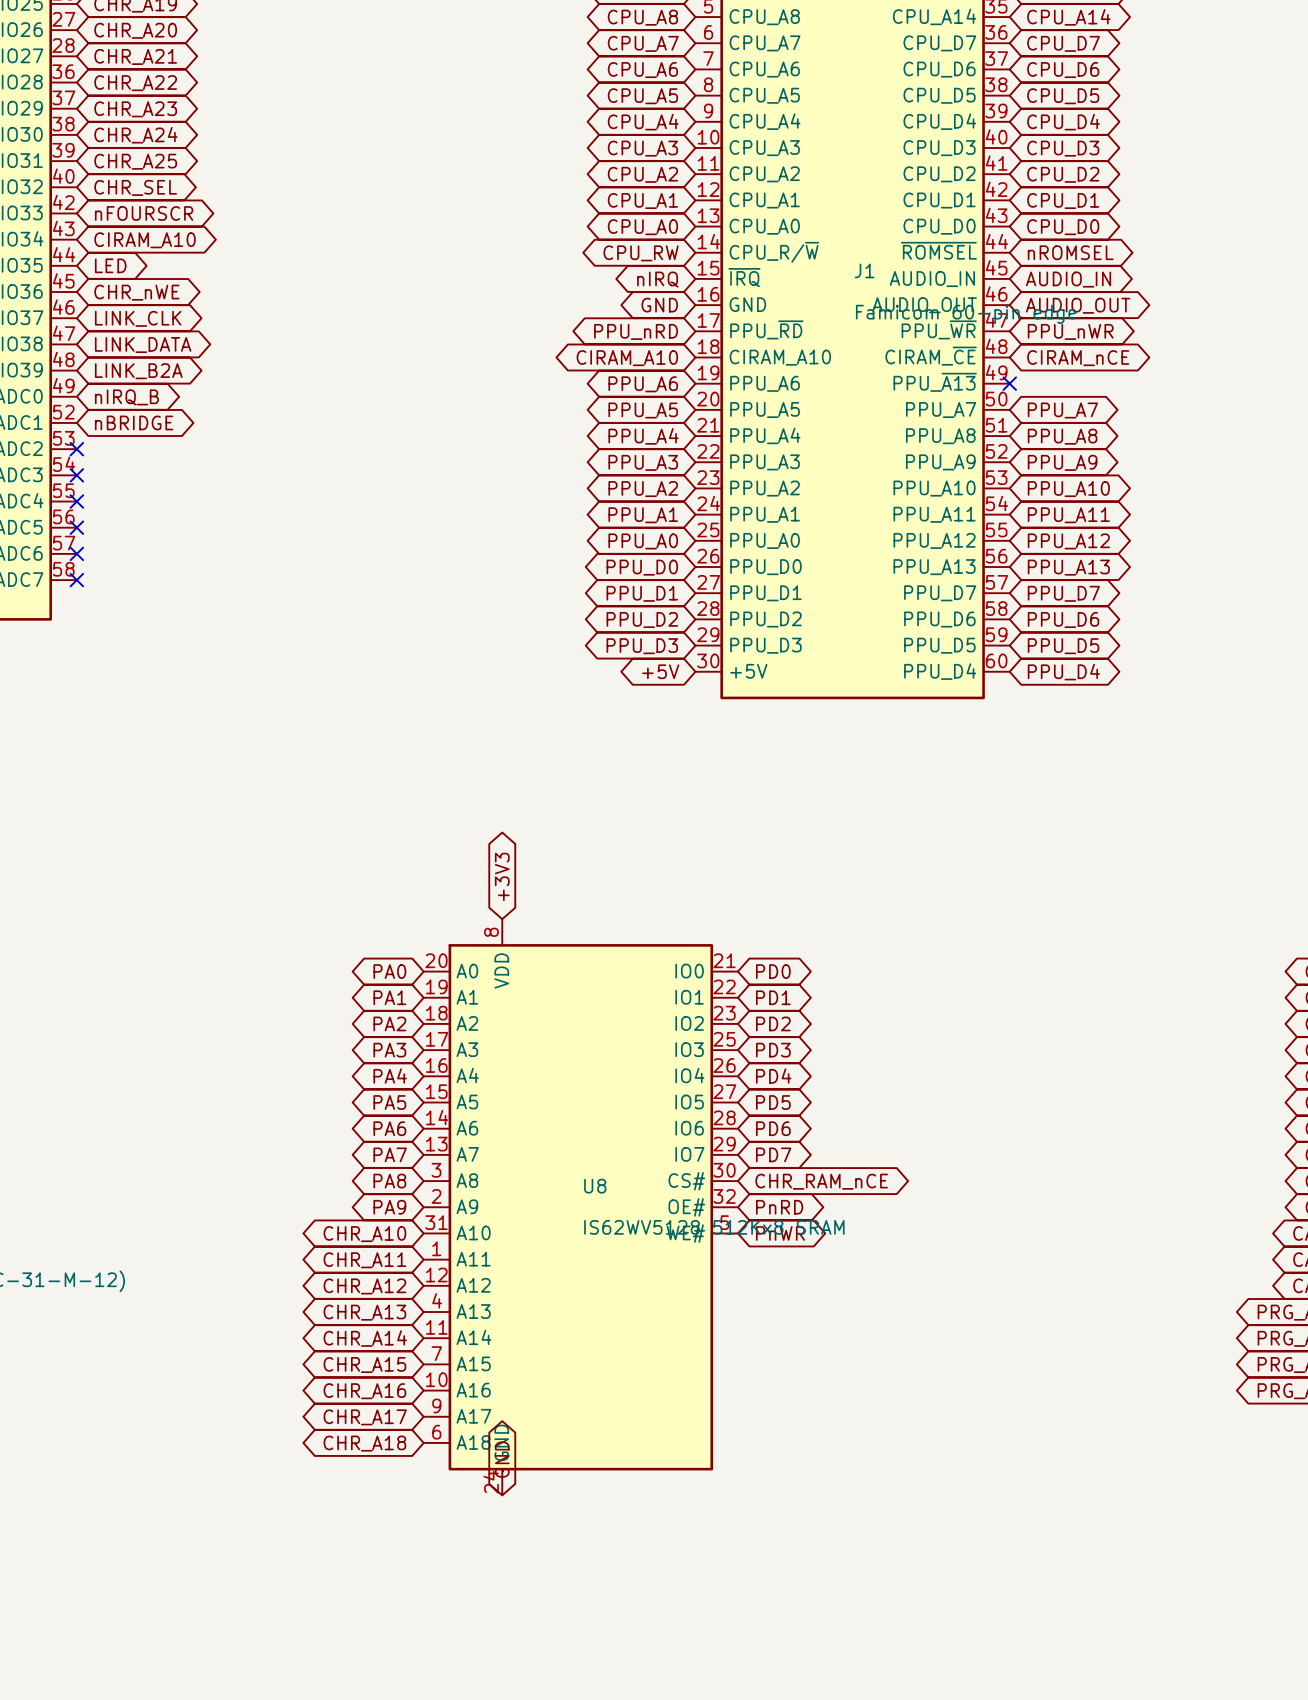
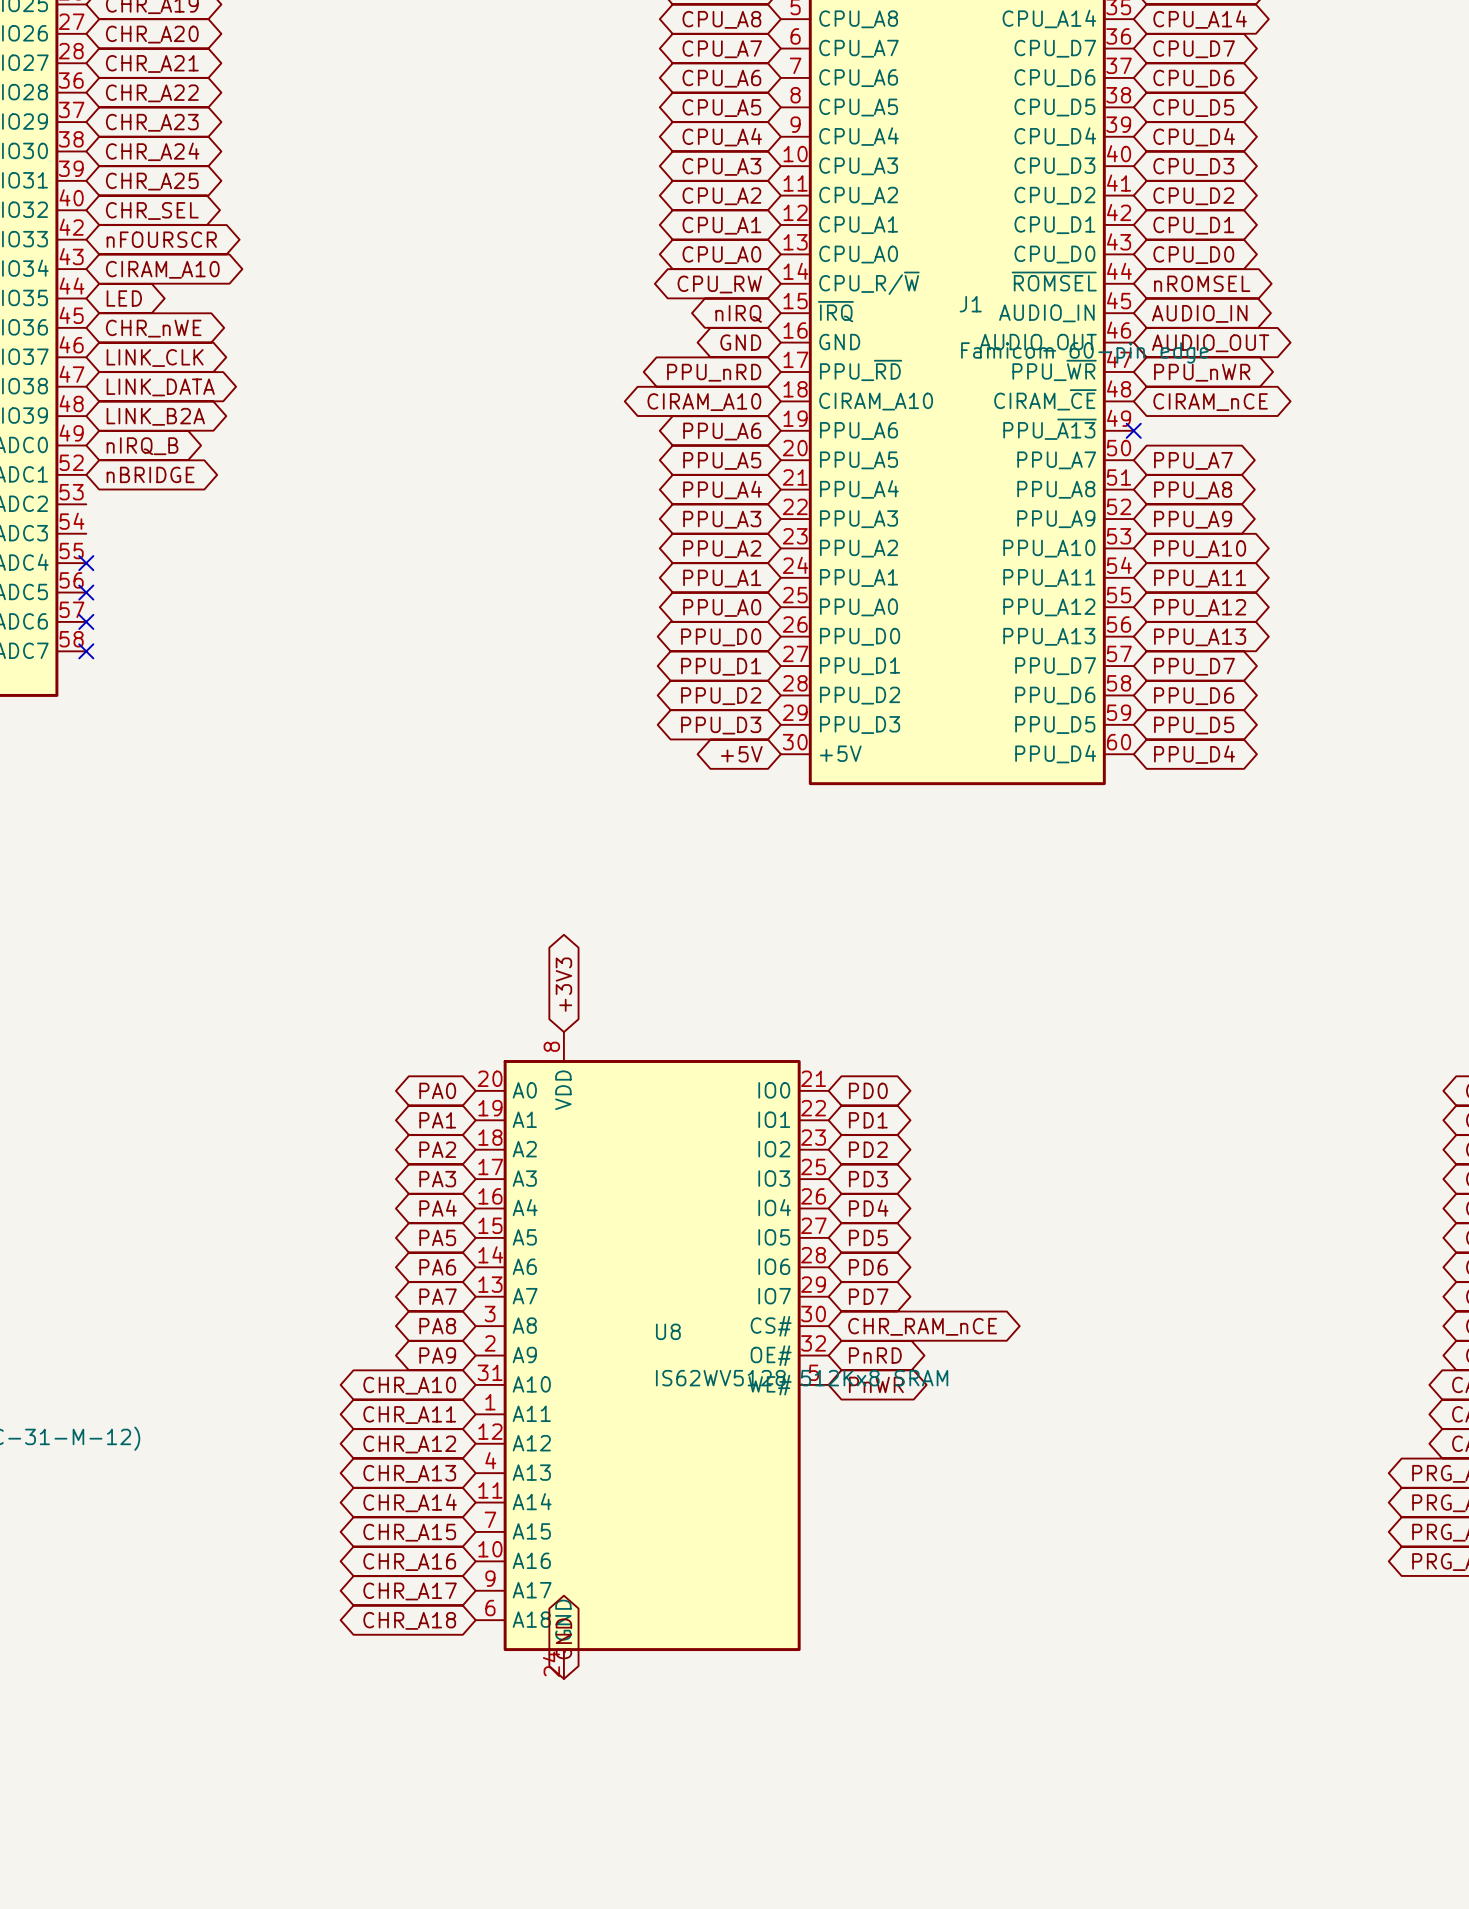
no-connect mark: (76, 449) -> none
no-connect mark: (76, 475) -> none

